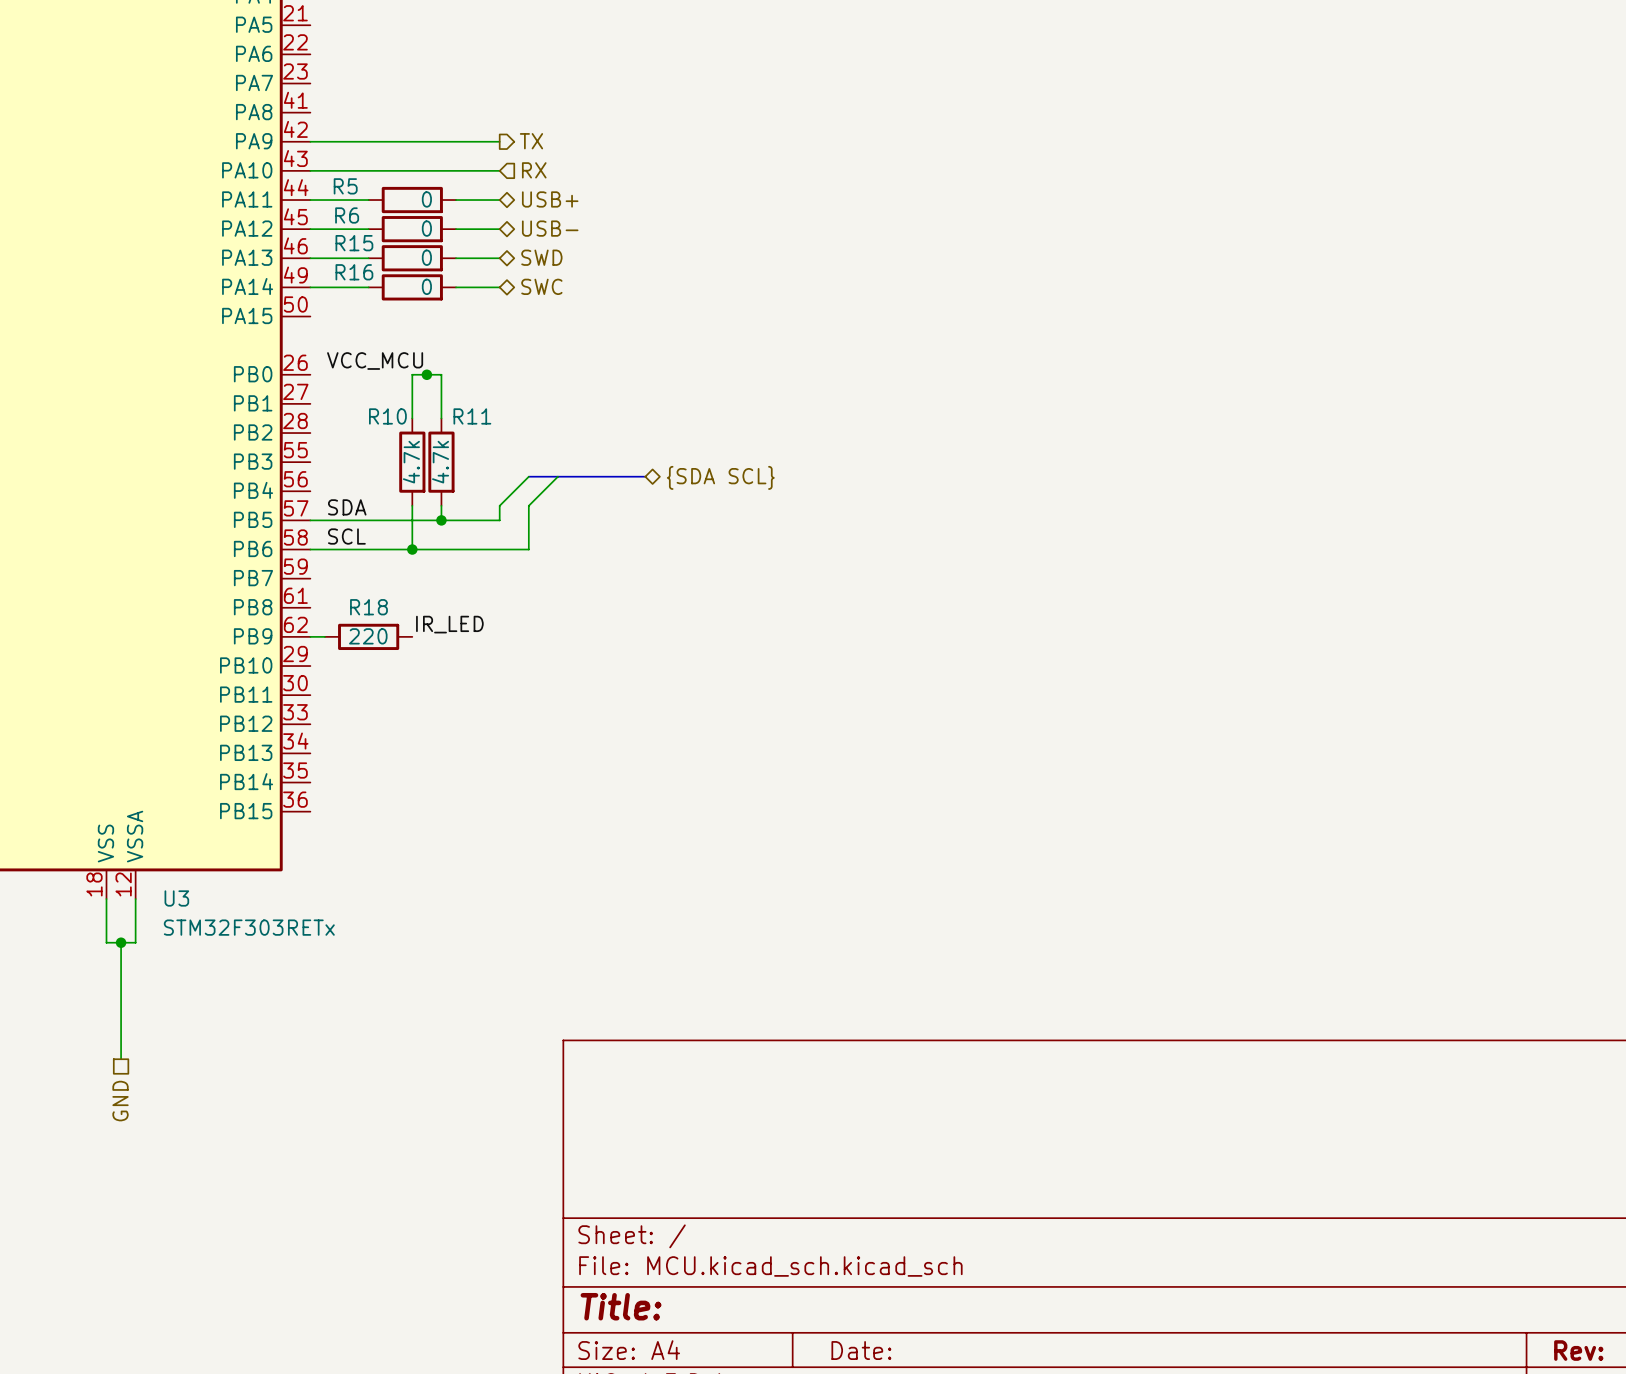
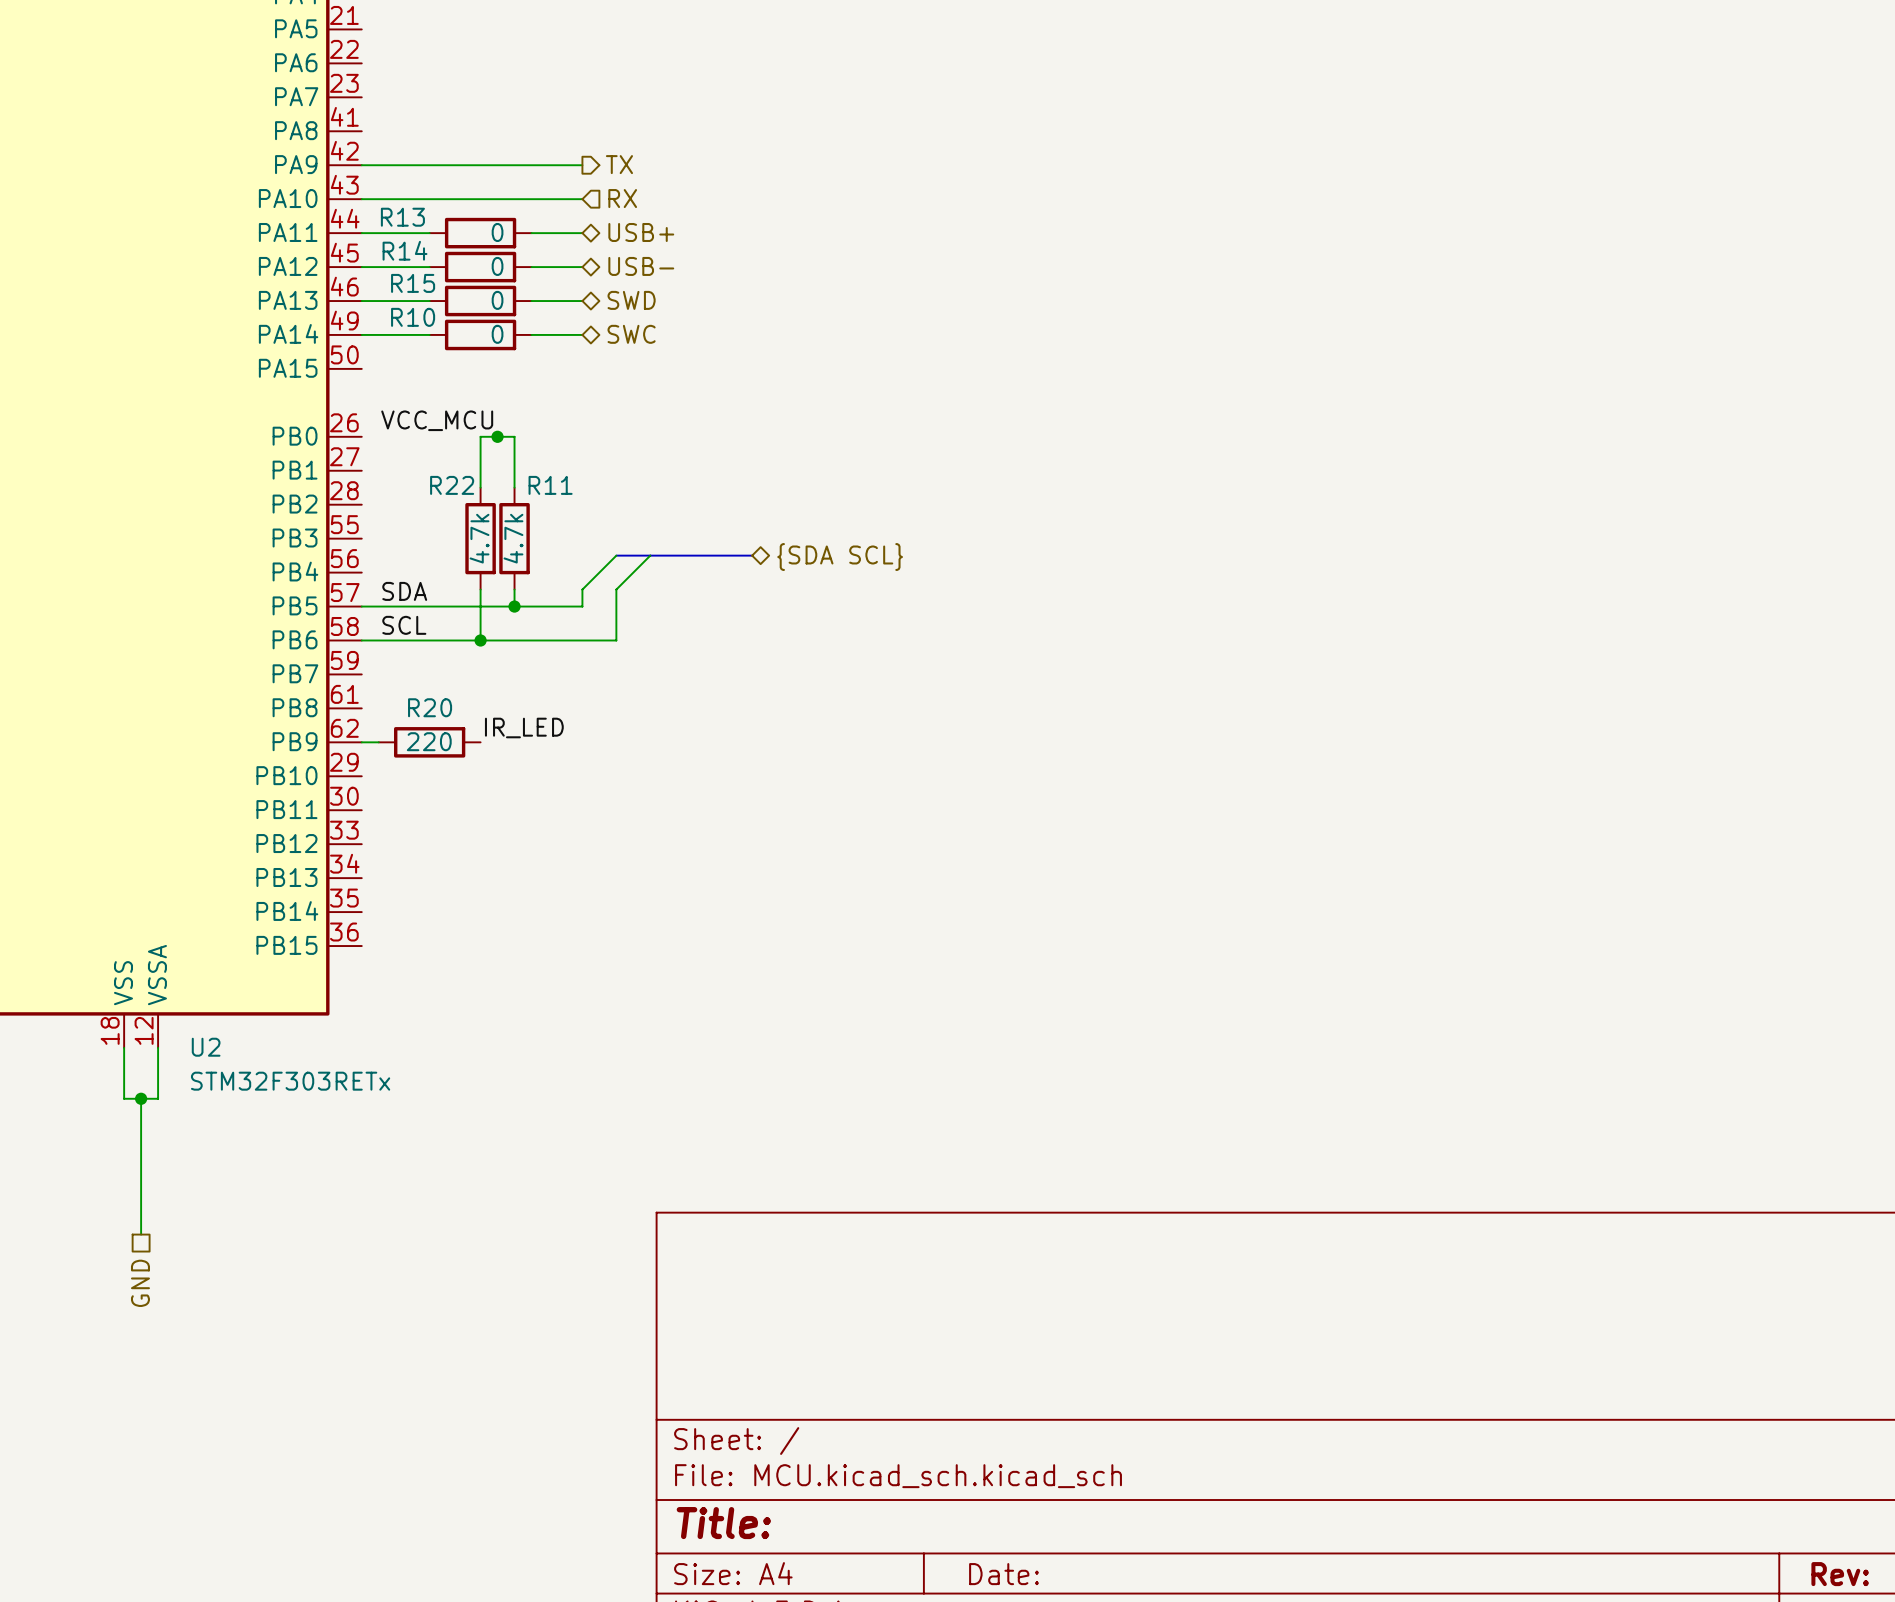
R5 name: R5 (345, 186) -> R13 (402, 217)
R6 name: R6 (347, 215) -> R14 (405, 250)
R16 name: R16 (354, 272) -> R10 (413, 317)
R10 name: R10 (387, 416) -> R22 (452, 485)
R18 name: R18 (368, 607) -> R20 (430, 707)
U3 name: U3 (176, 898) -> U2 (206, 1047)

